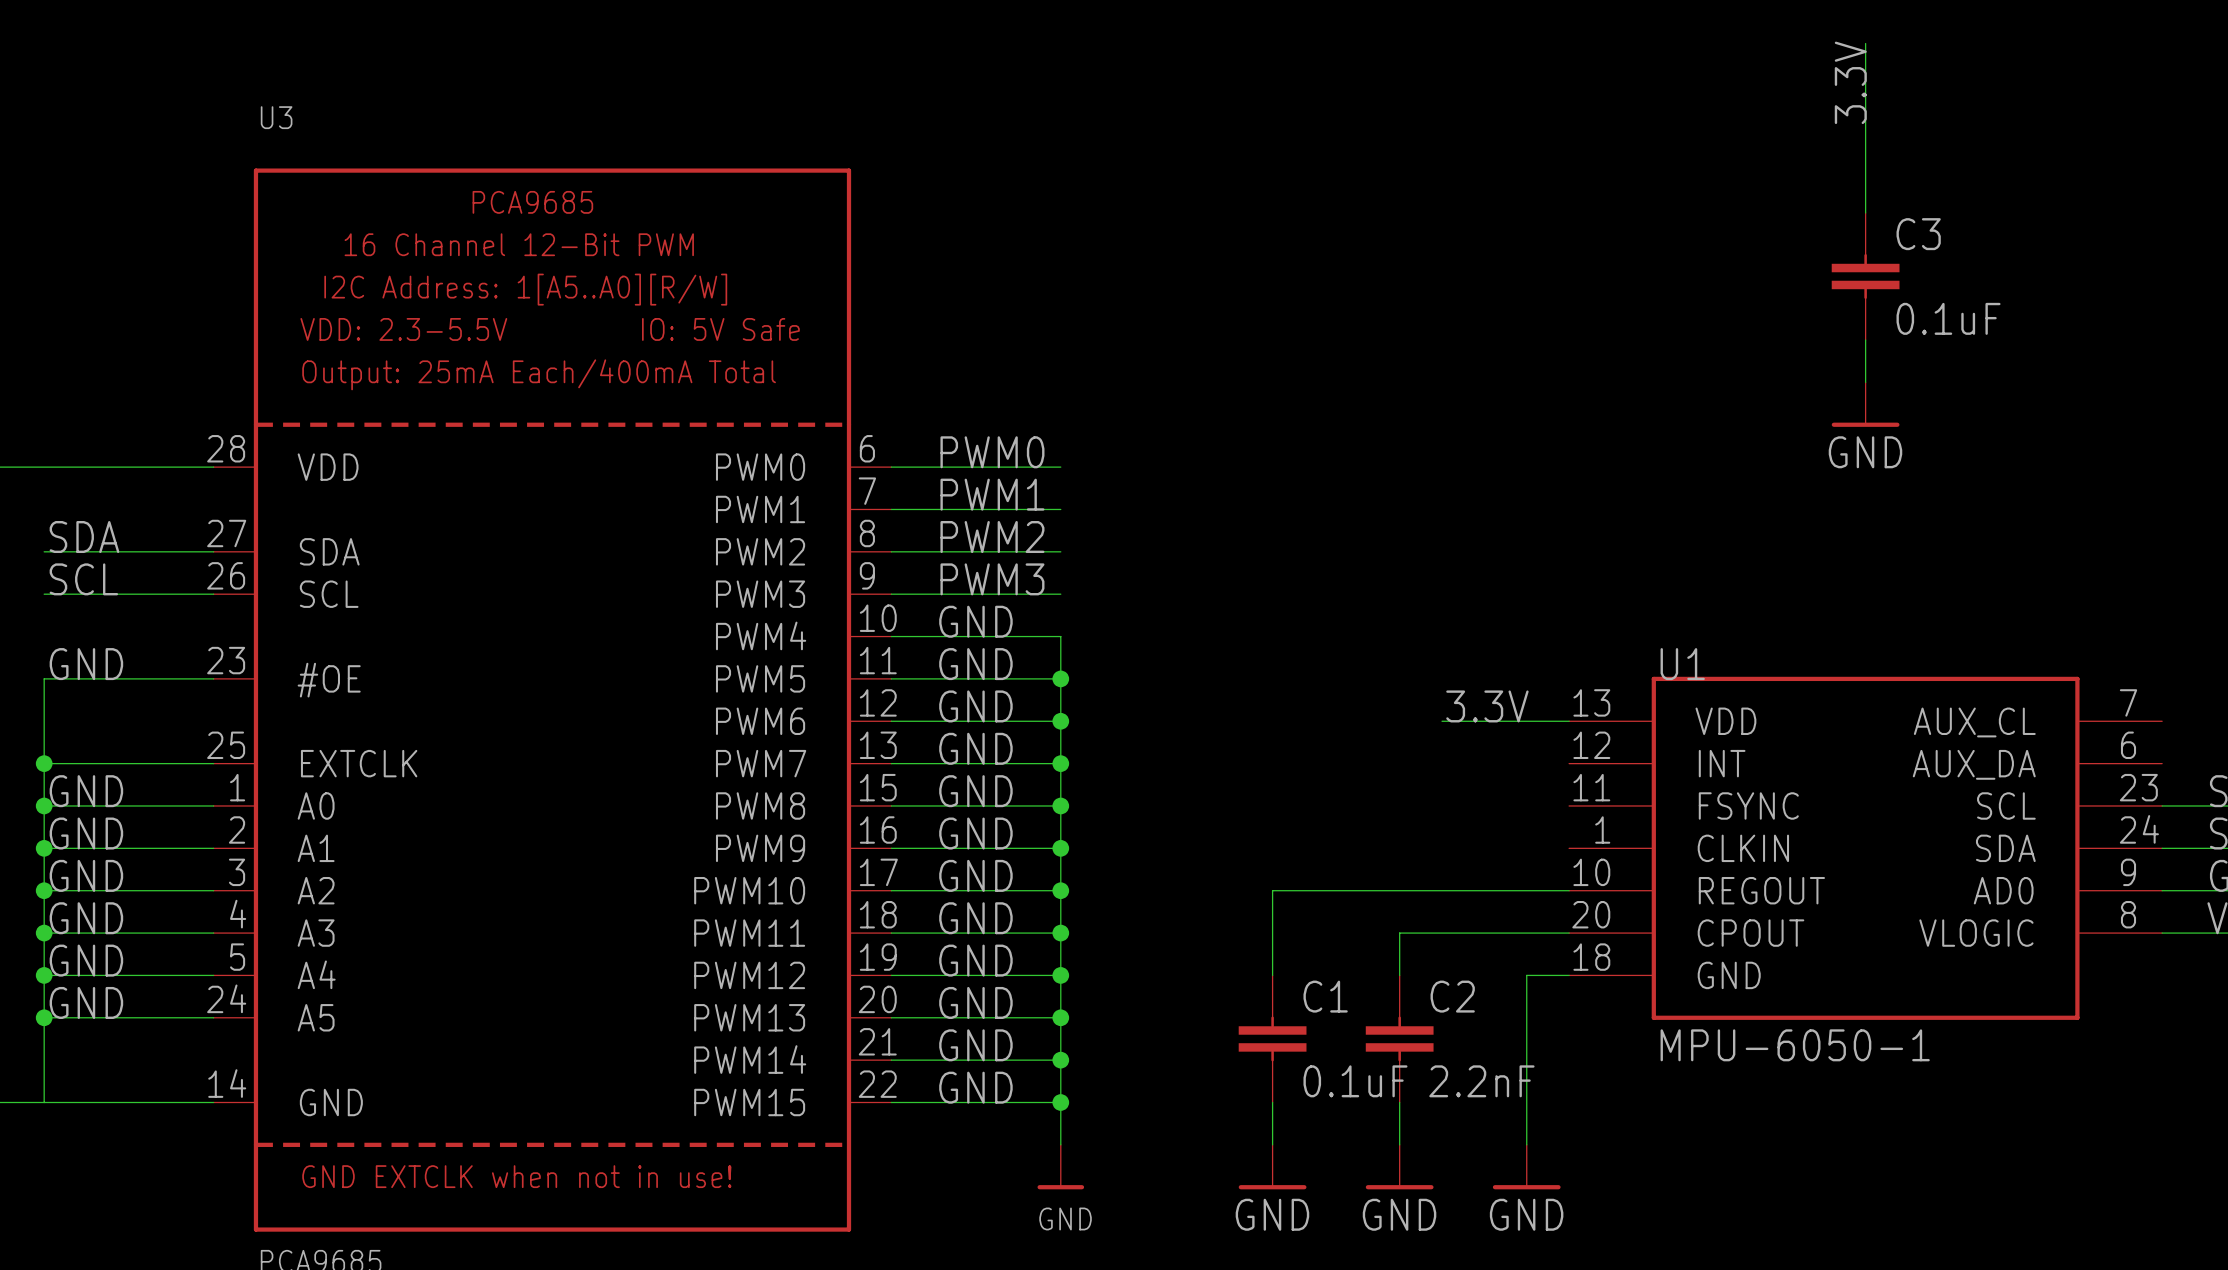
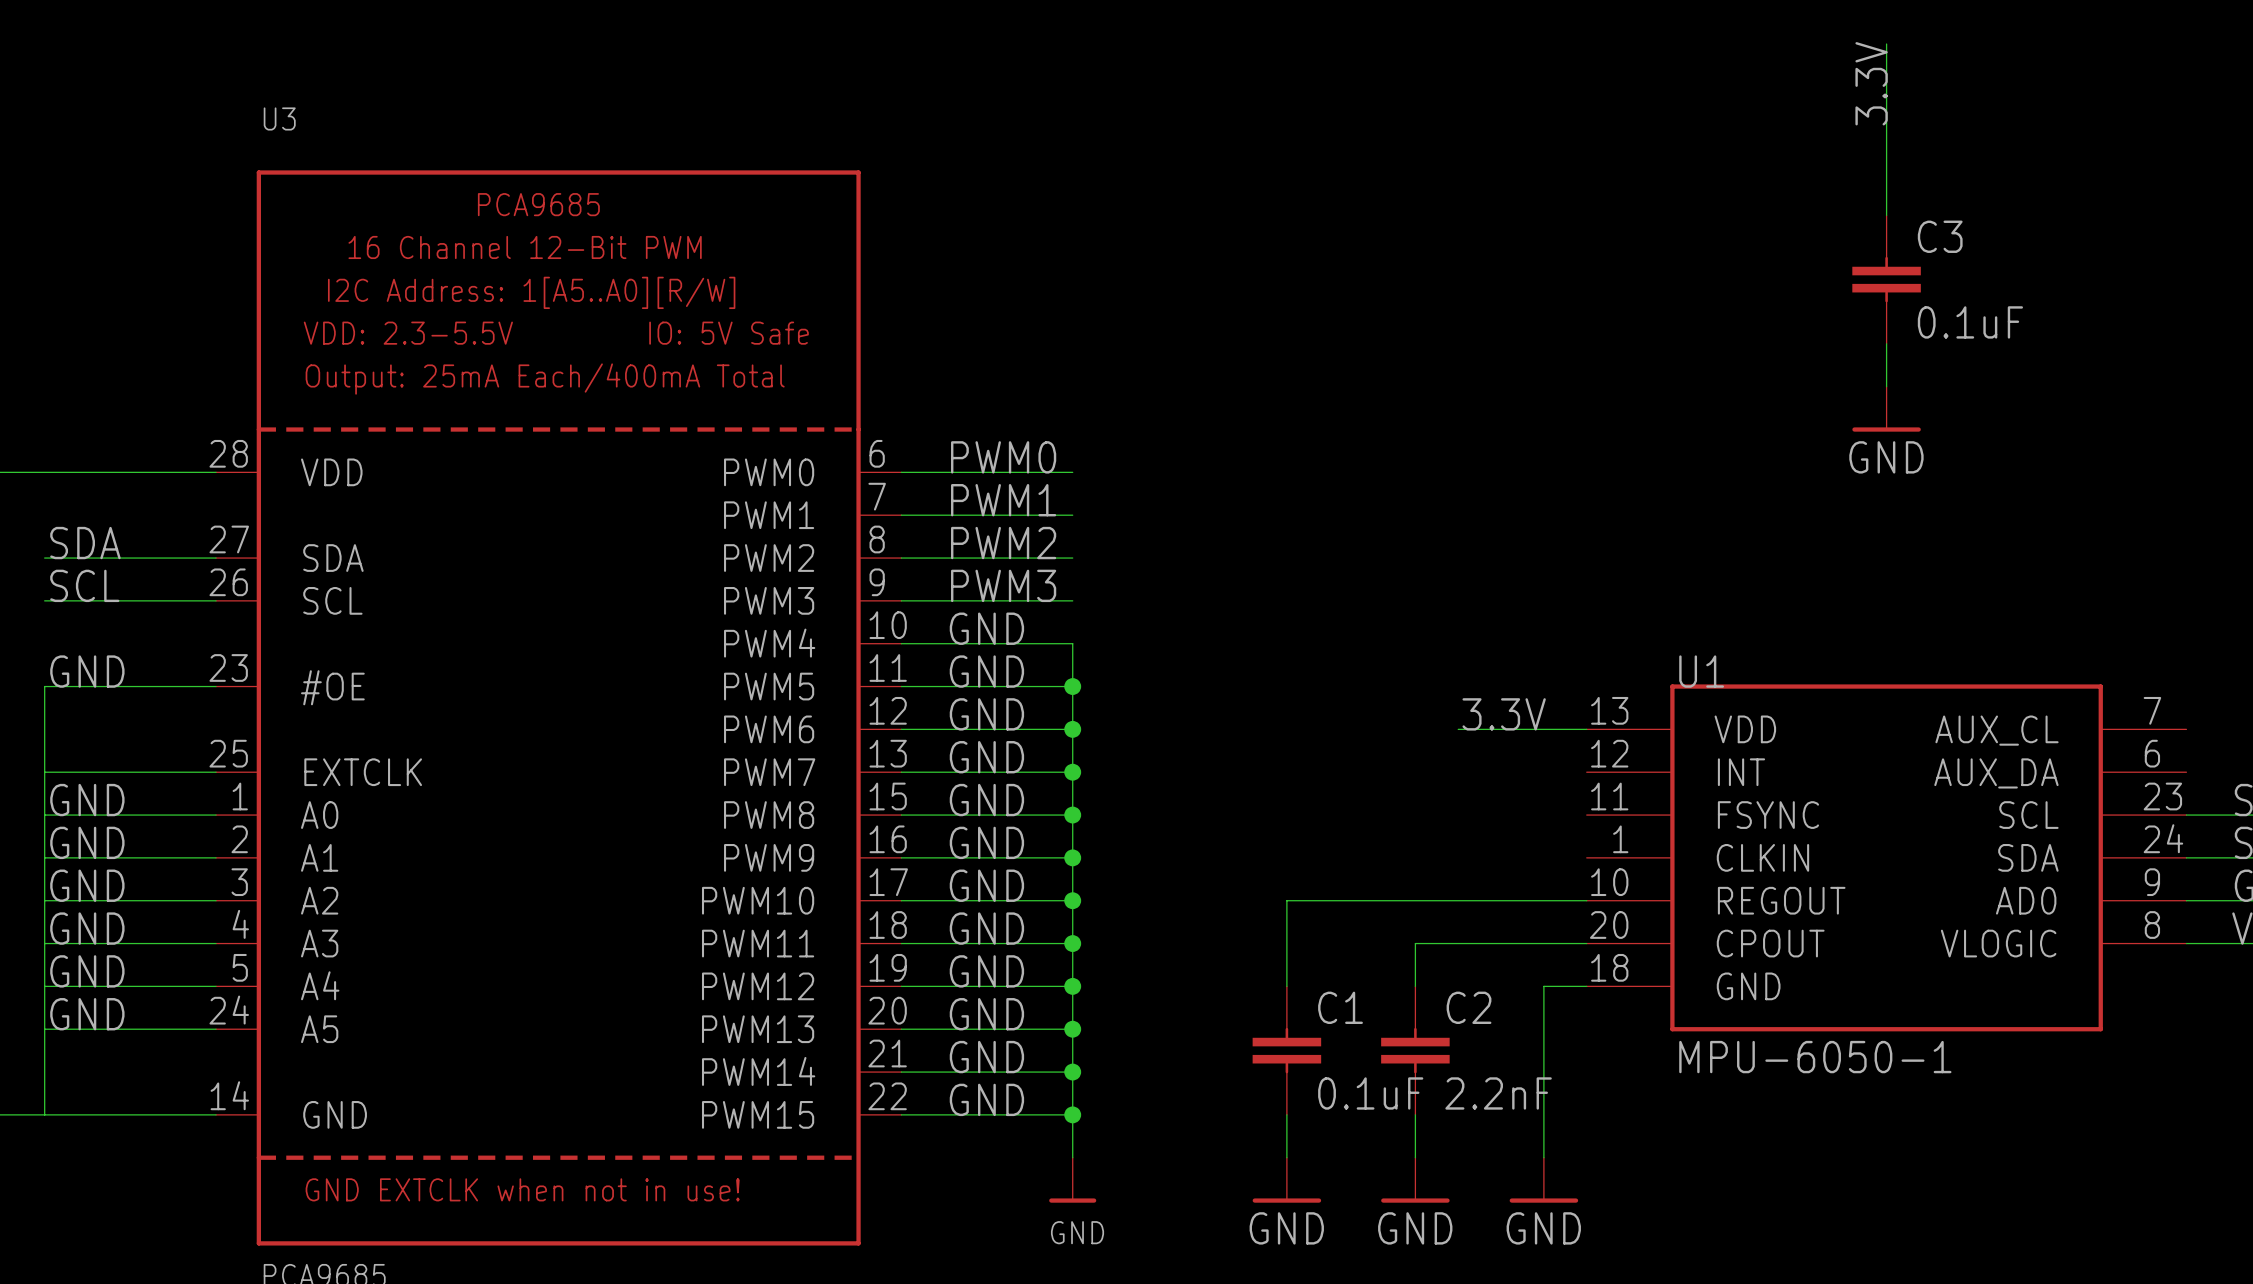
junction: (44, 763) -> none
junction: (44, 805) -> none
junction: (44, 848) -> none
junction: (44, 890) -> none
junction: (44, 933) -> none
junction: (44, 975) -> none
junction: (44, 1017) -> none

